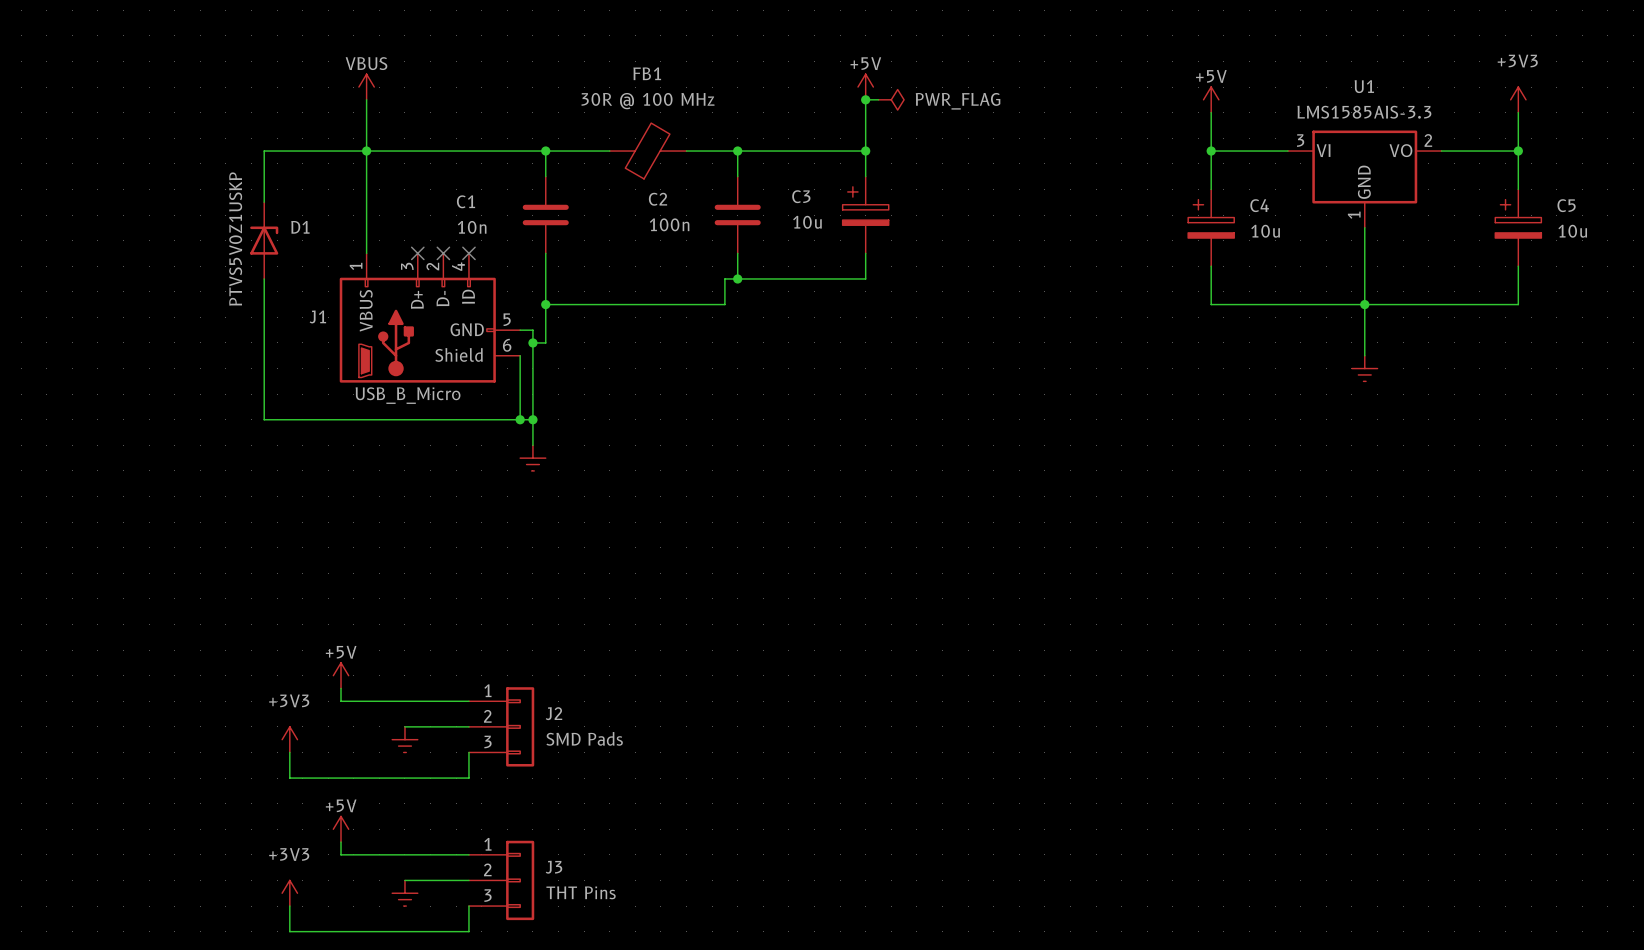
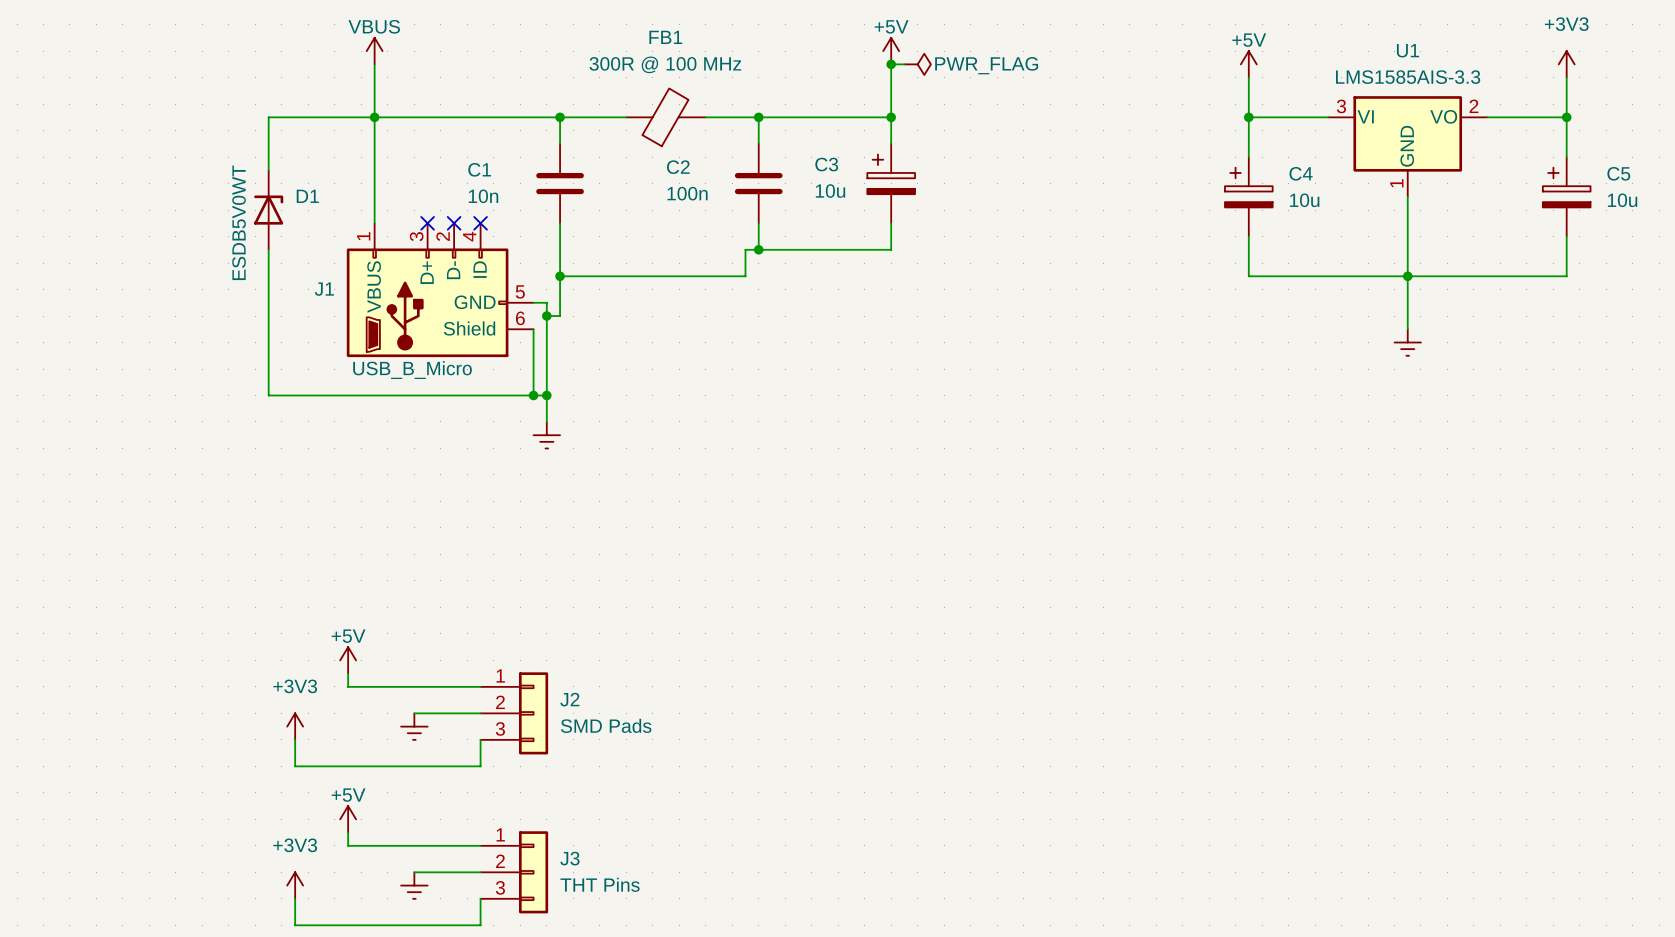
FB1 value: 30R @ 100 MHz (648, 101) -> 300R @ 100 MHz (665, 64)
D1 value: PTVS5V0Z1USKP (235, 239) -> ESDB5V0WT (239, 222)

